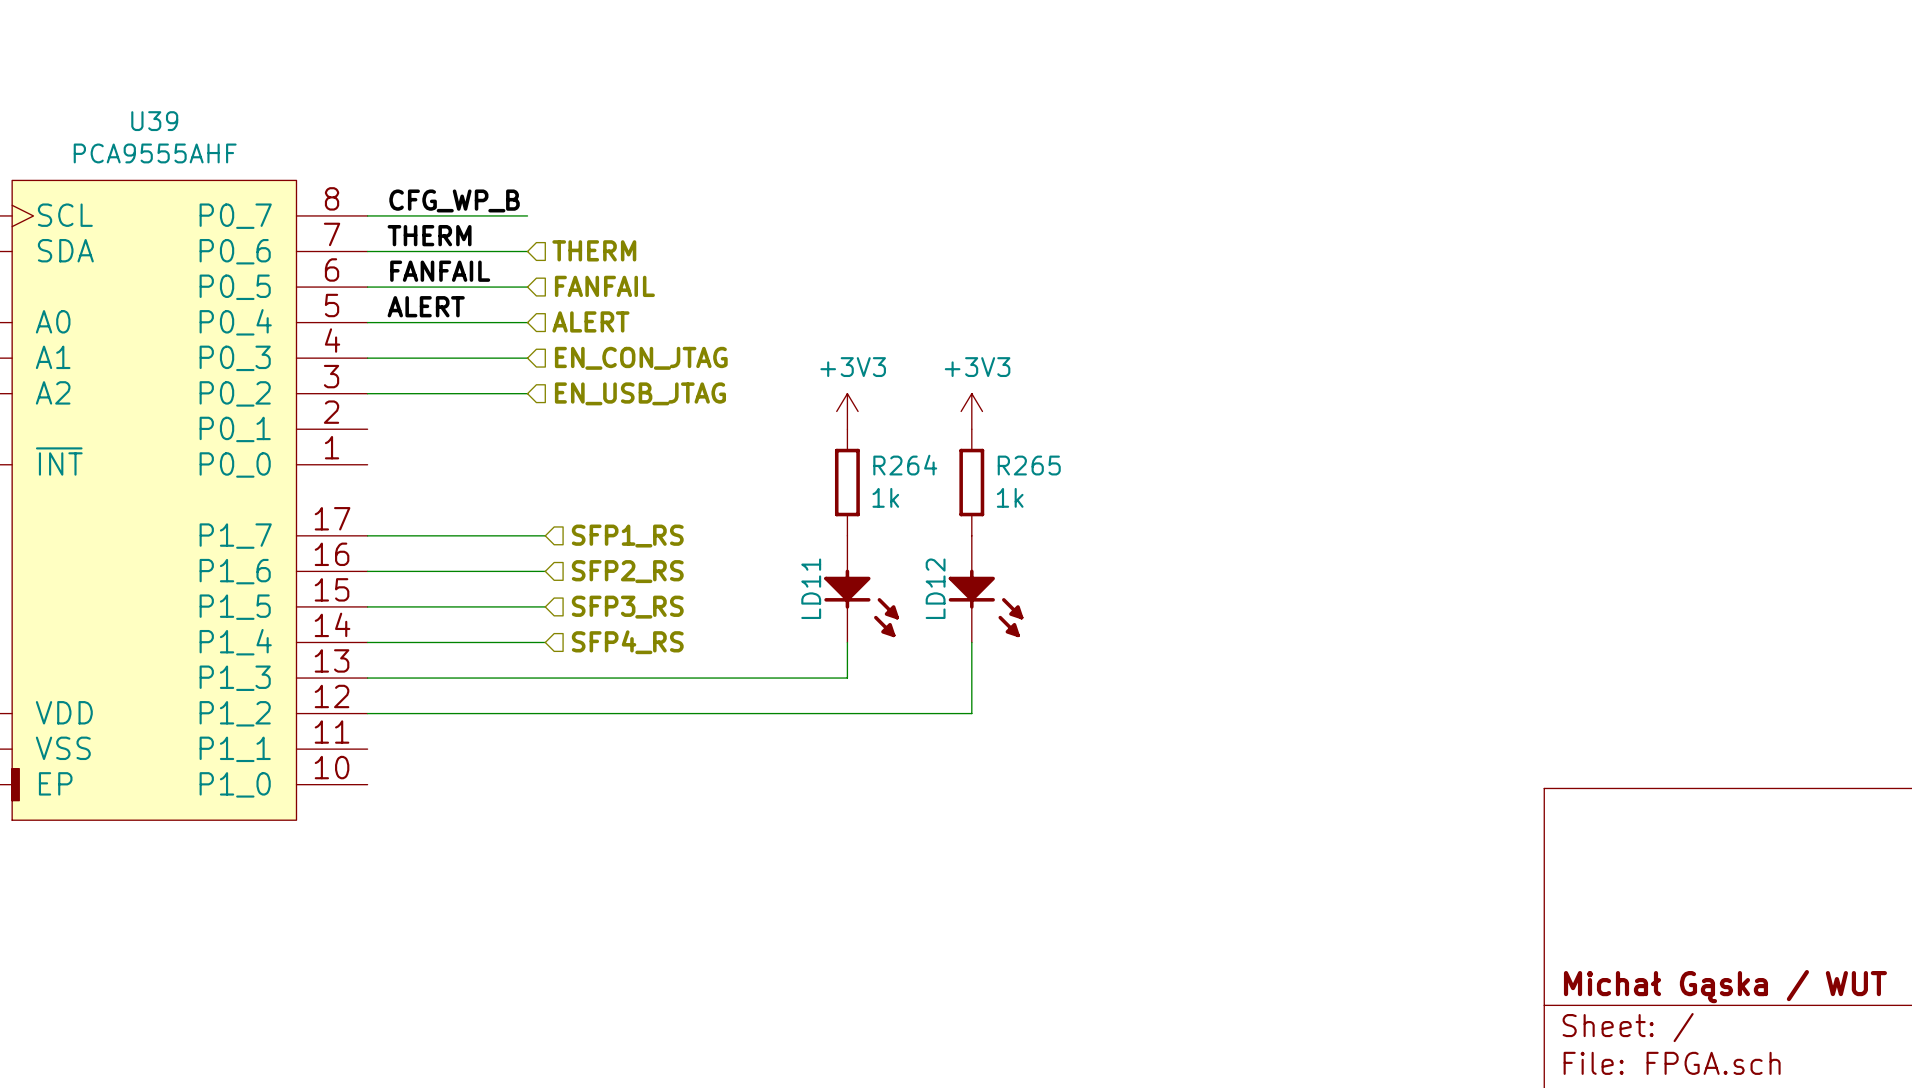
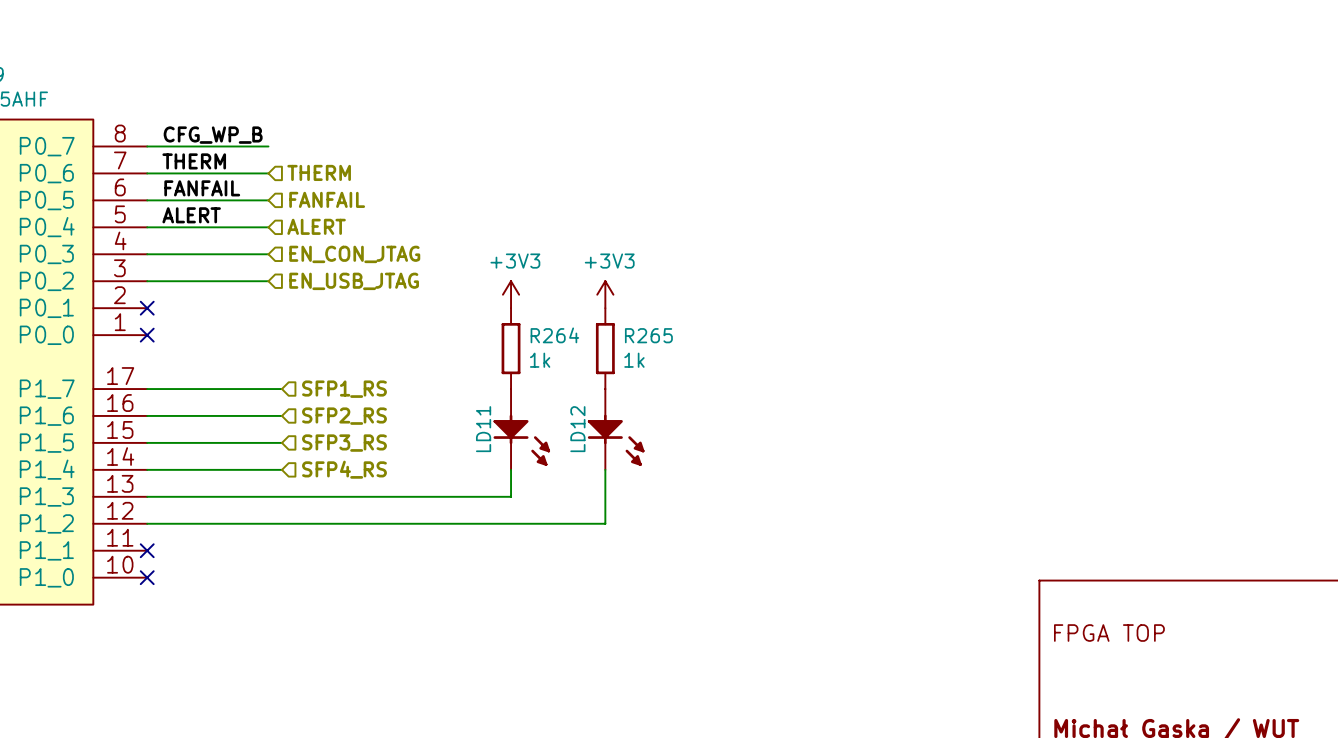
no-connect mark: none -> (147, 308)
no-connect mark: none -> (147, 335)
no-connect mark: none -> (147, 550)
no-connect mark: none -> (147, 577)
title block: none -> FPGA TOP (1109, 633)

